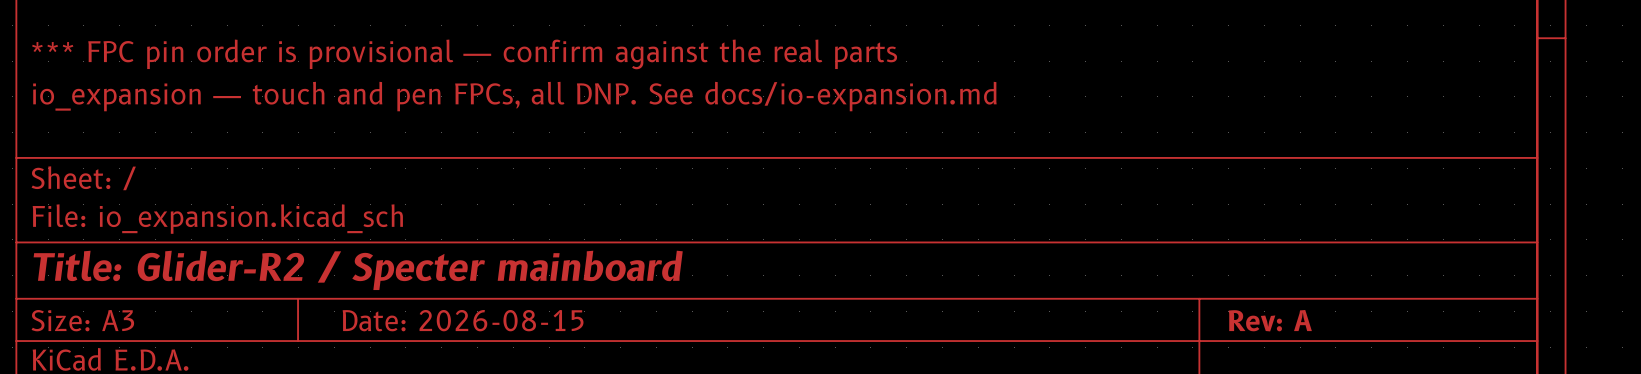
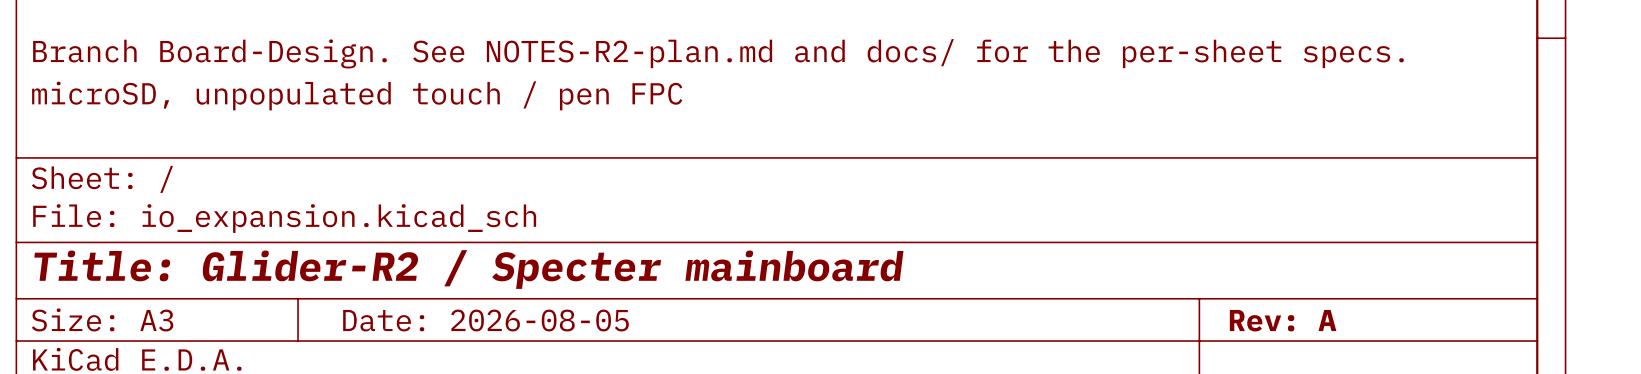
title block: *** FPC pin order is provisional — confirm against the real parts (464, 54) -> Branch Board-Design. See NOTES-R2-plan.md and docs/ for the per-sheet specs. (718, 53)
title block: io_expansion — touch and pen FPCs, all DNP. See docs/io-expansion.md (514, 96) -> microSD, unpopulated touch / pen FPC (357, 95)
title block: Date: 2026-08-15 (463, 320) -> Date: 2026-08-05 (485, 320)

